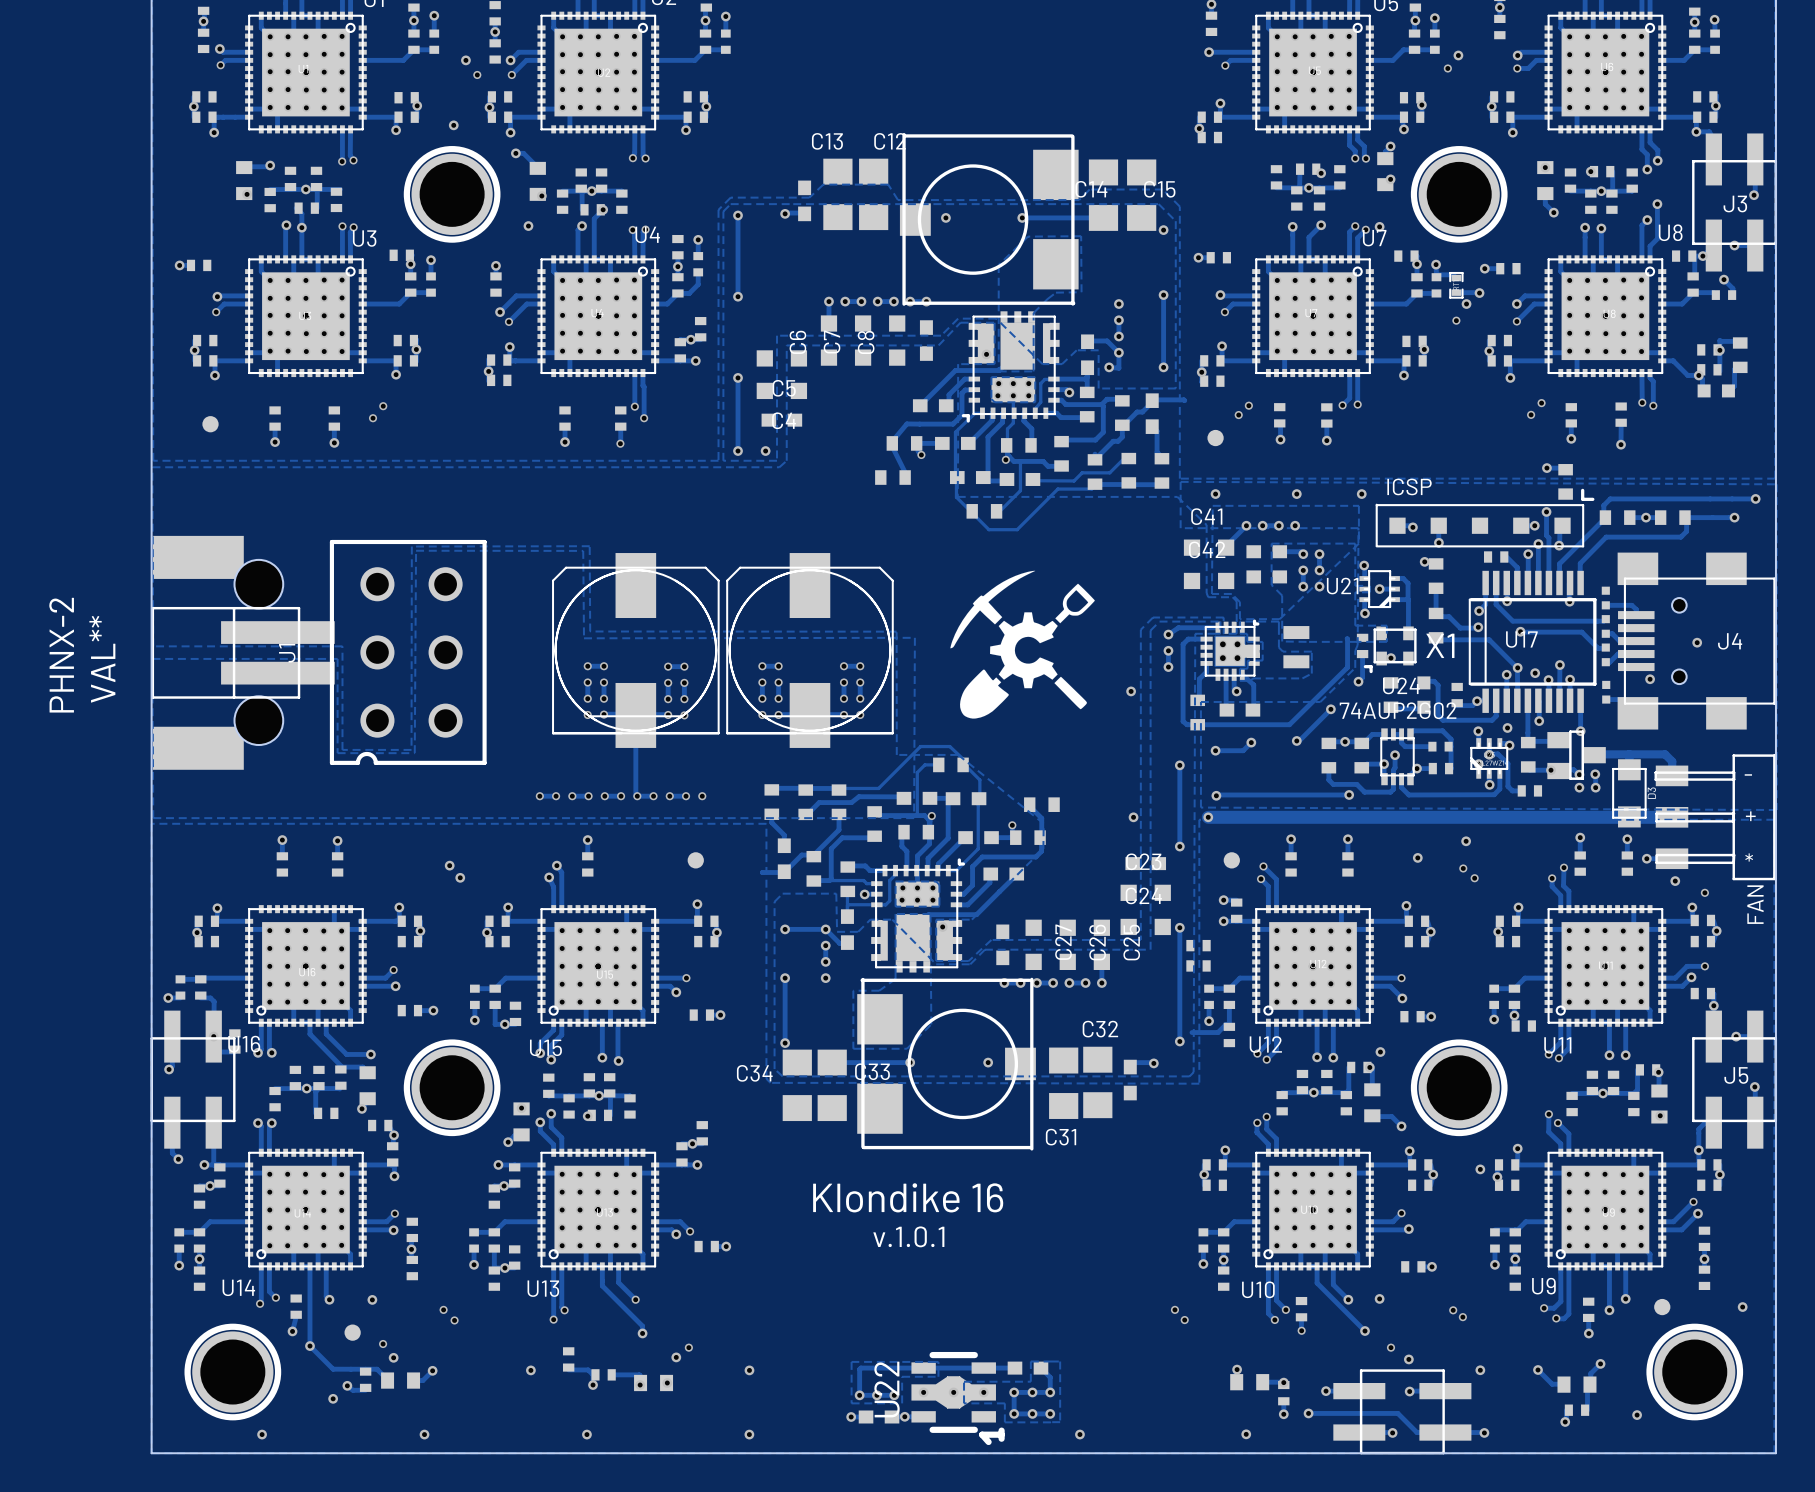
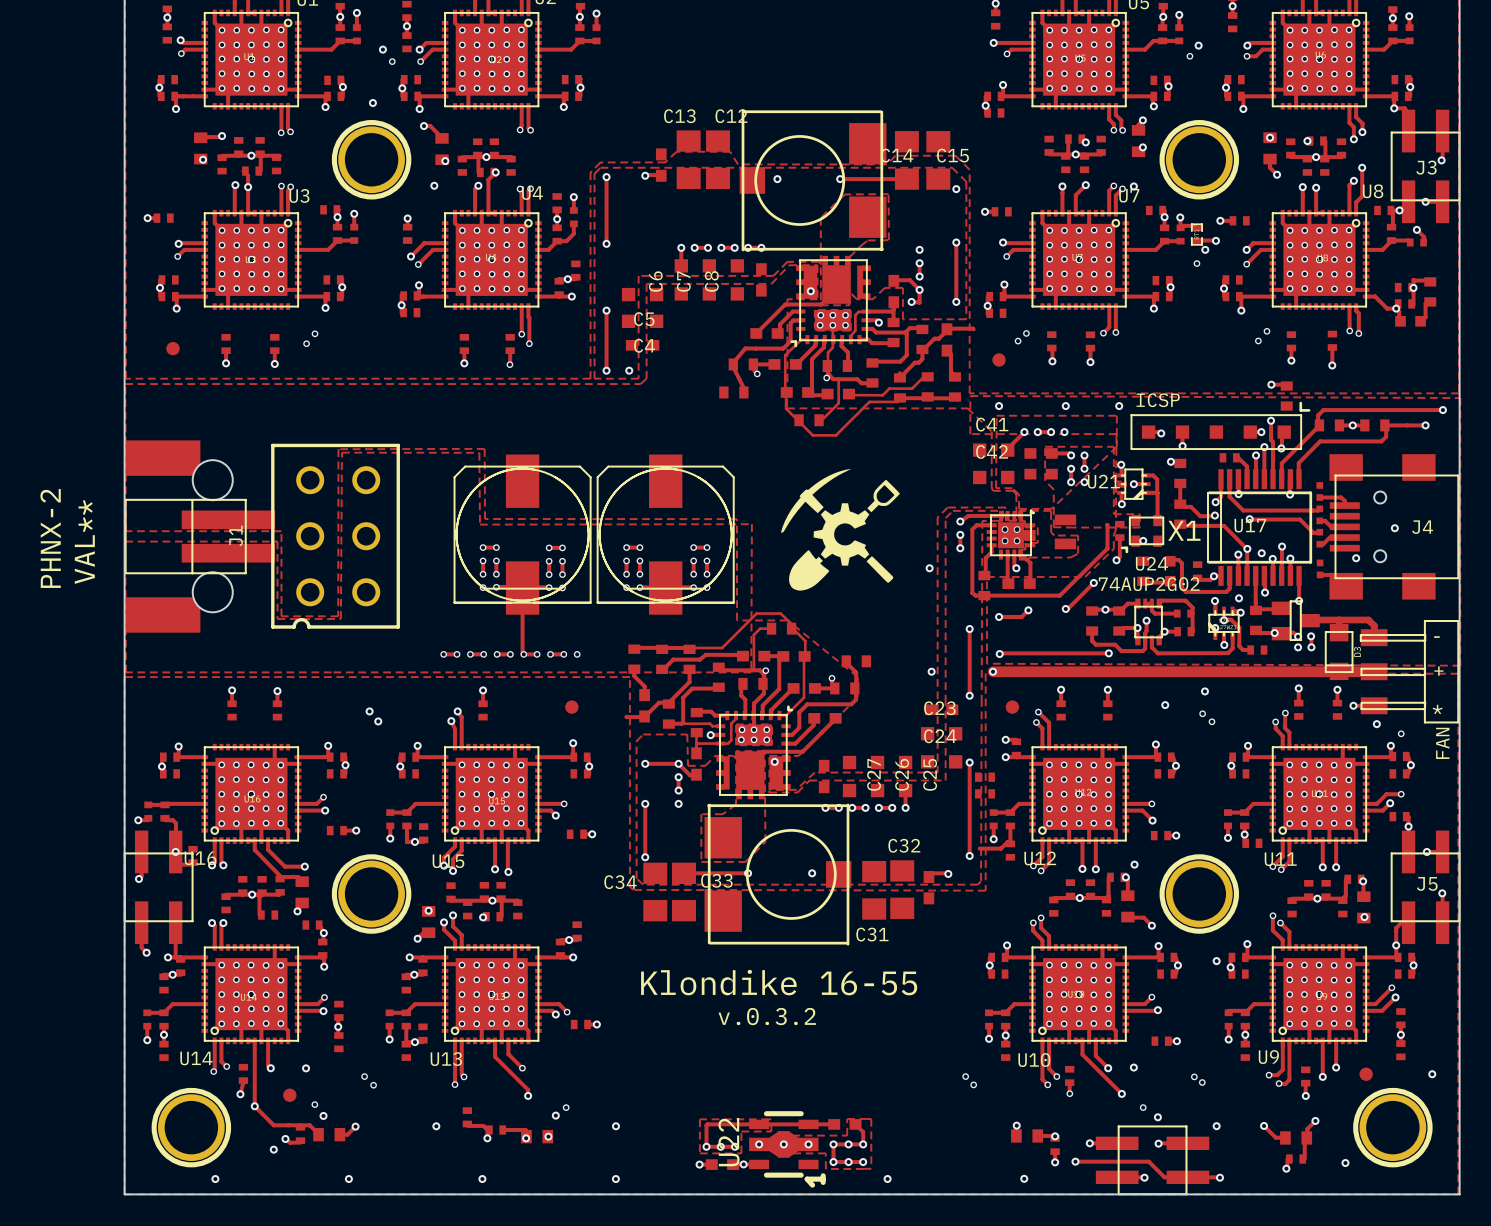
text: Klondike 16 (908, 1197) -> Klondike 16-55 (779, 982)
text: v.1.0.1 (908, 1236) -> v.0.3.2 (767, 1016)

